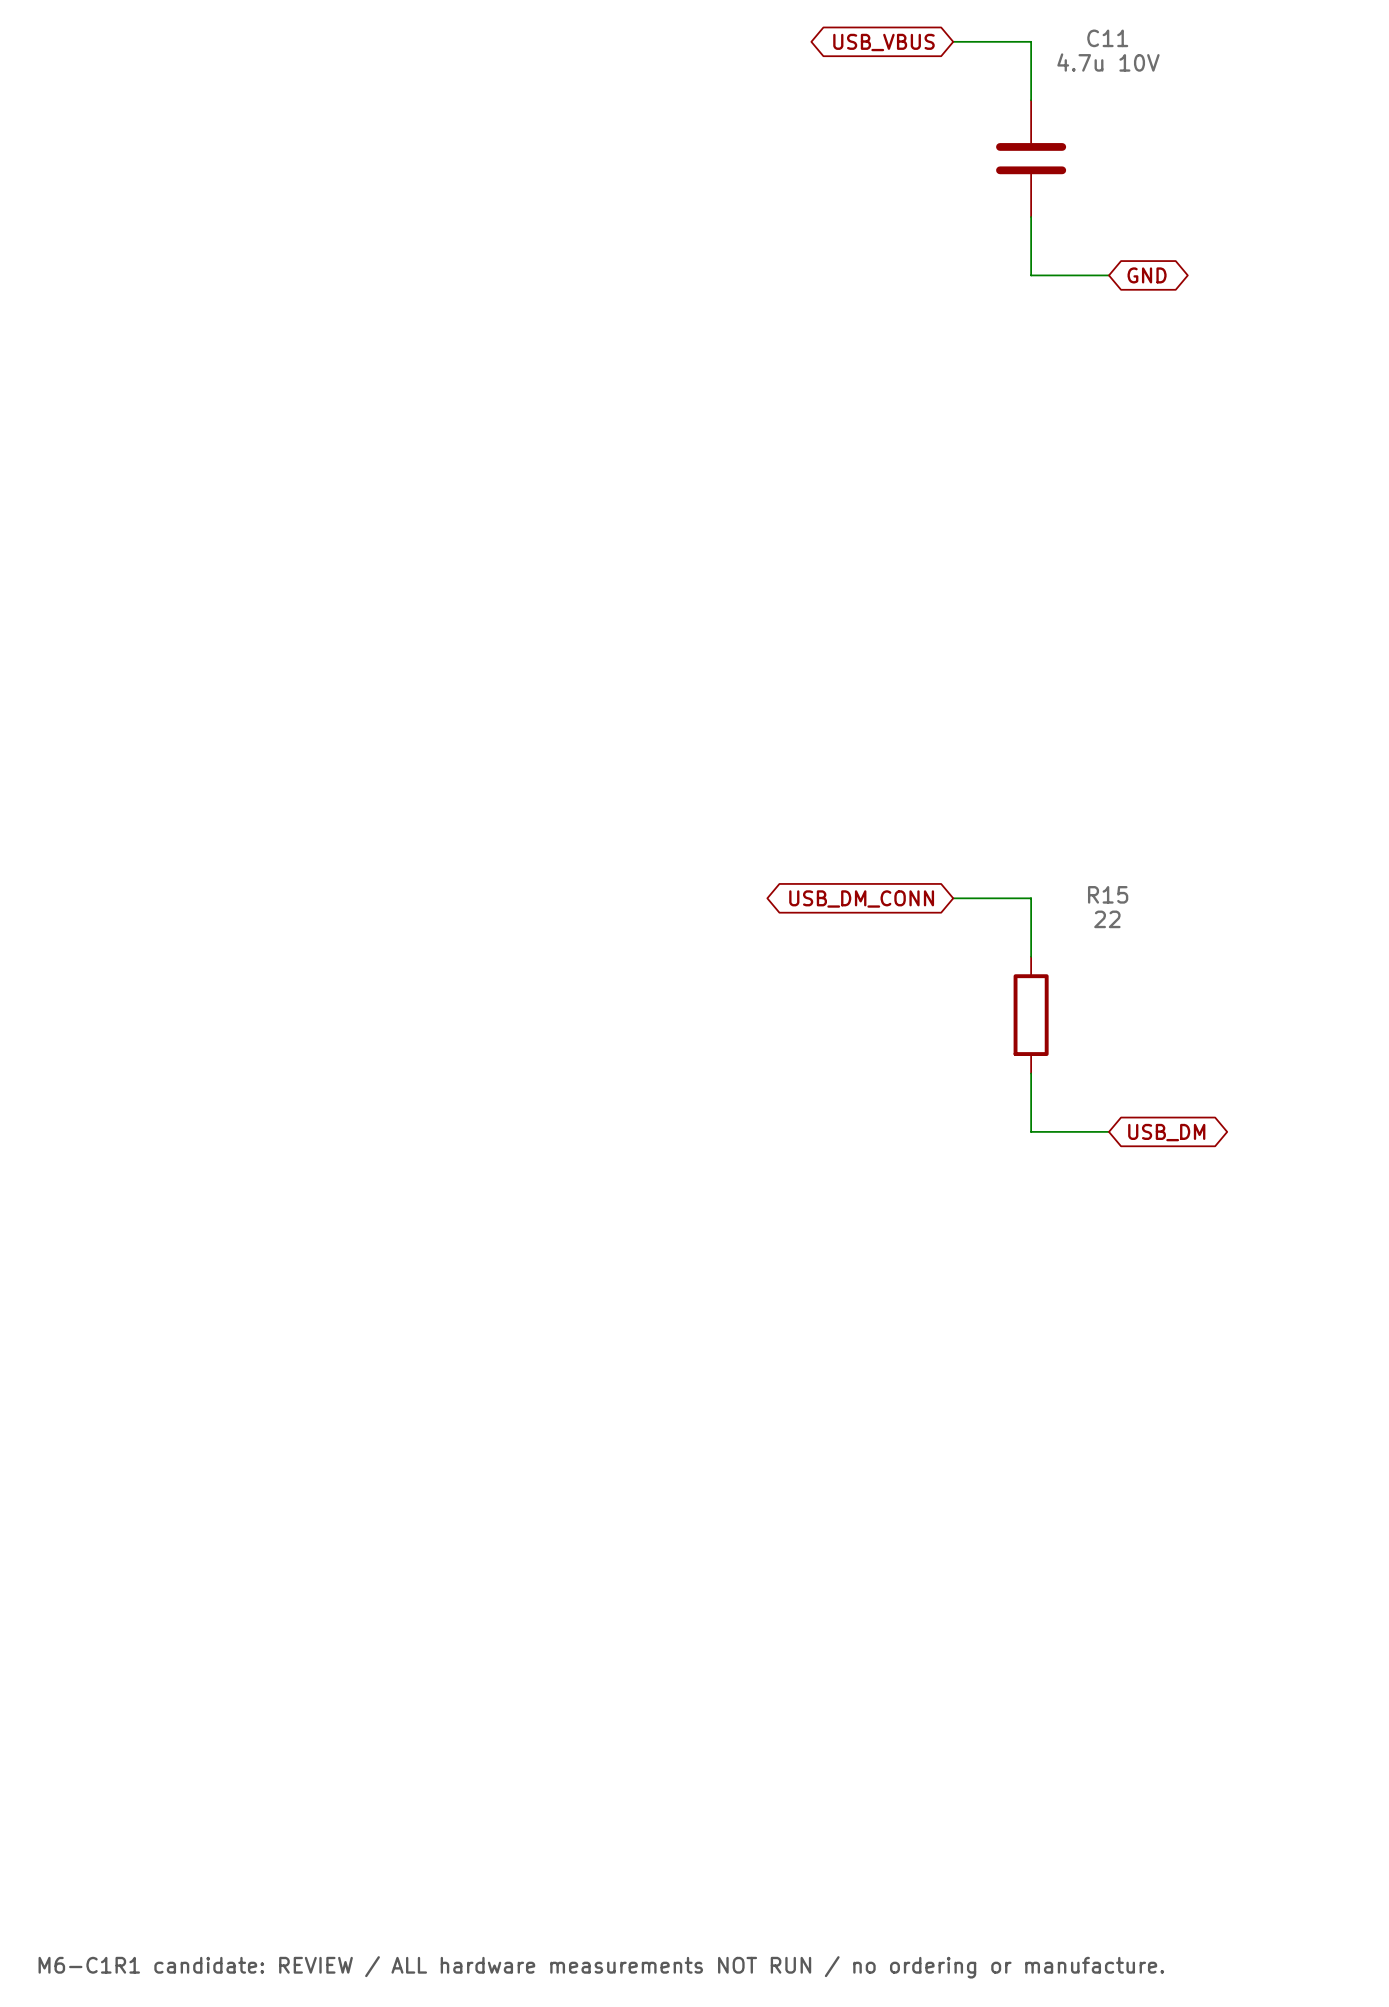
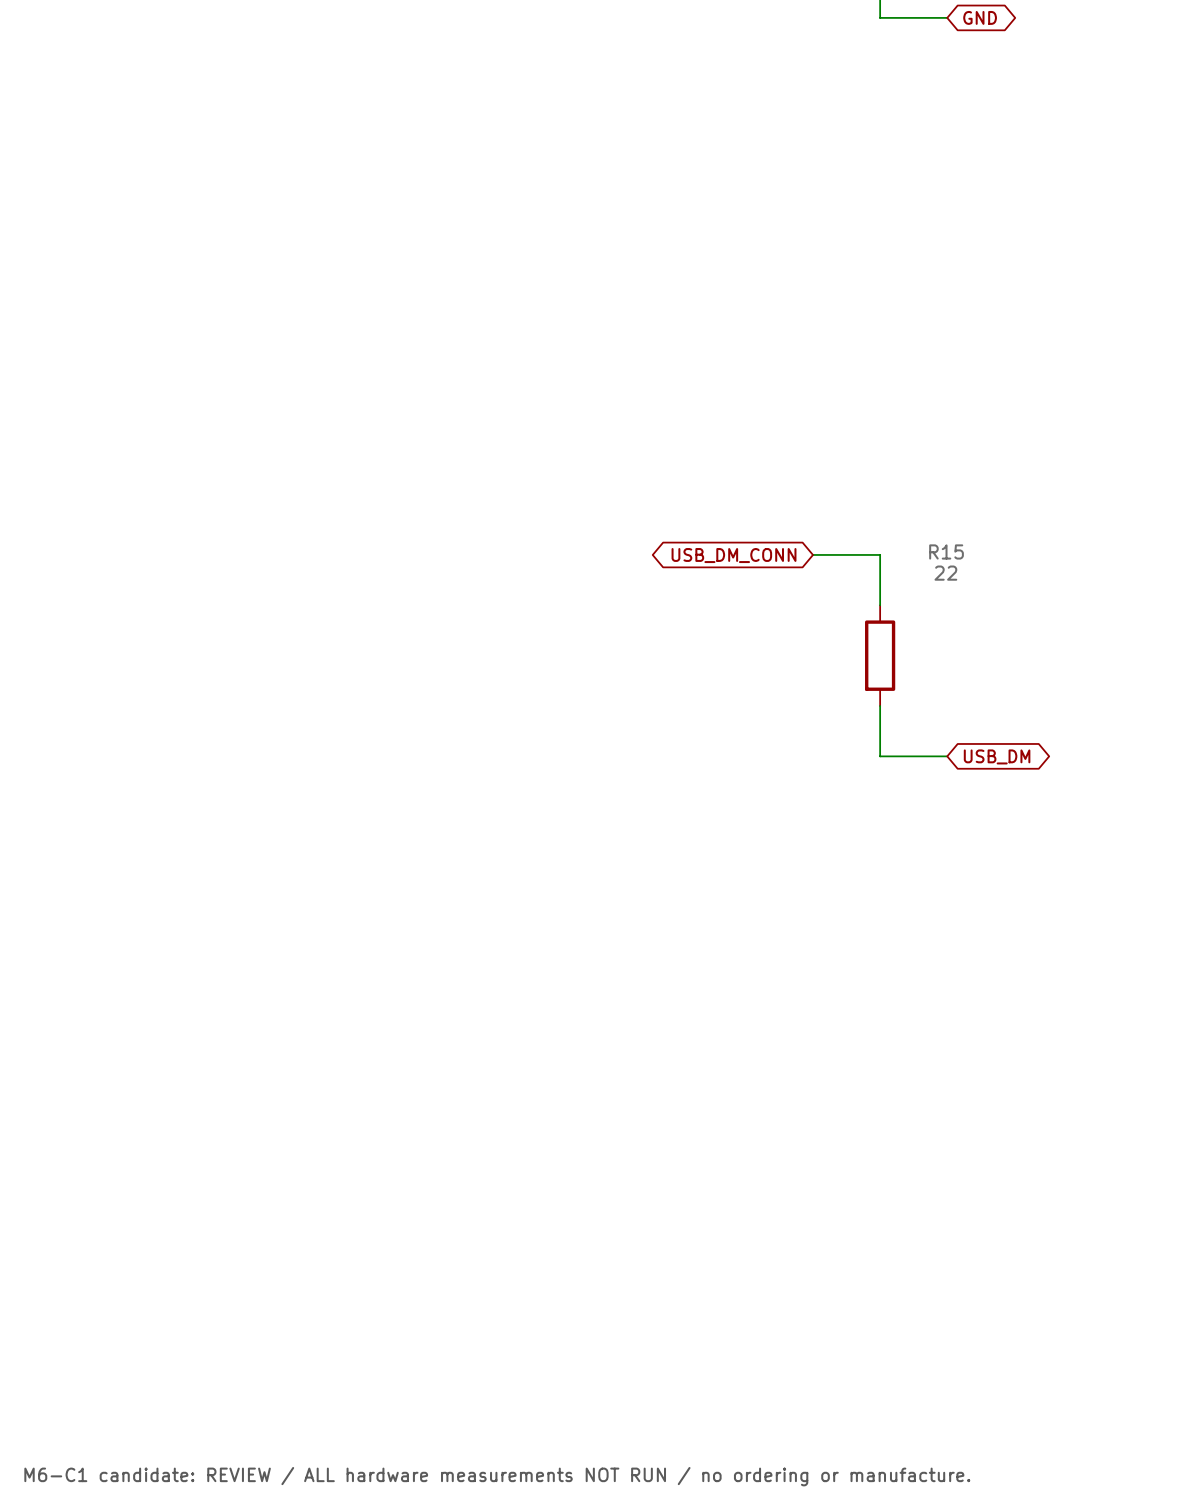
text: M6-C1R1 candidate: REVIEW / ALL hardware measurements NOT RUN / no ordering or manufacture. (601, 1967) -> M6-C1 candidate: REVIEW / ALL hardware measurements NOT RUN / no ordering or manufacture. (497, 1476)

